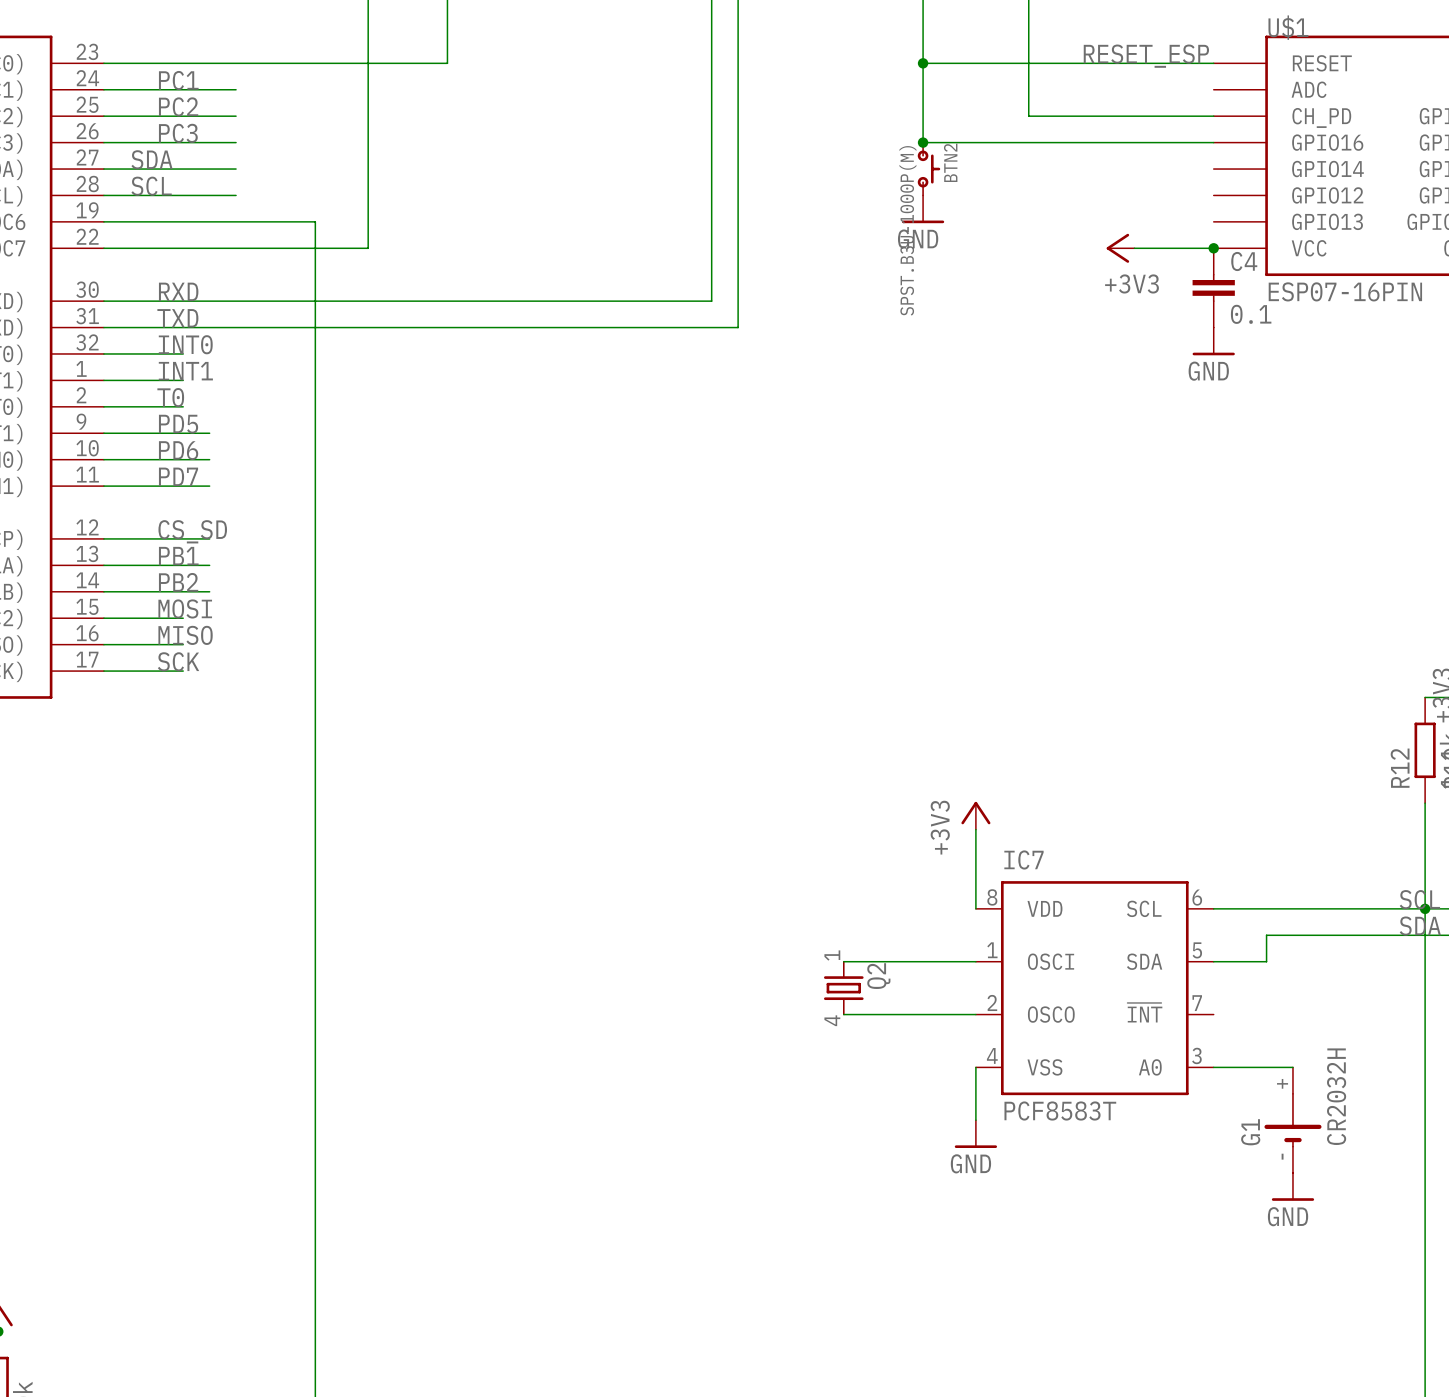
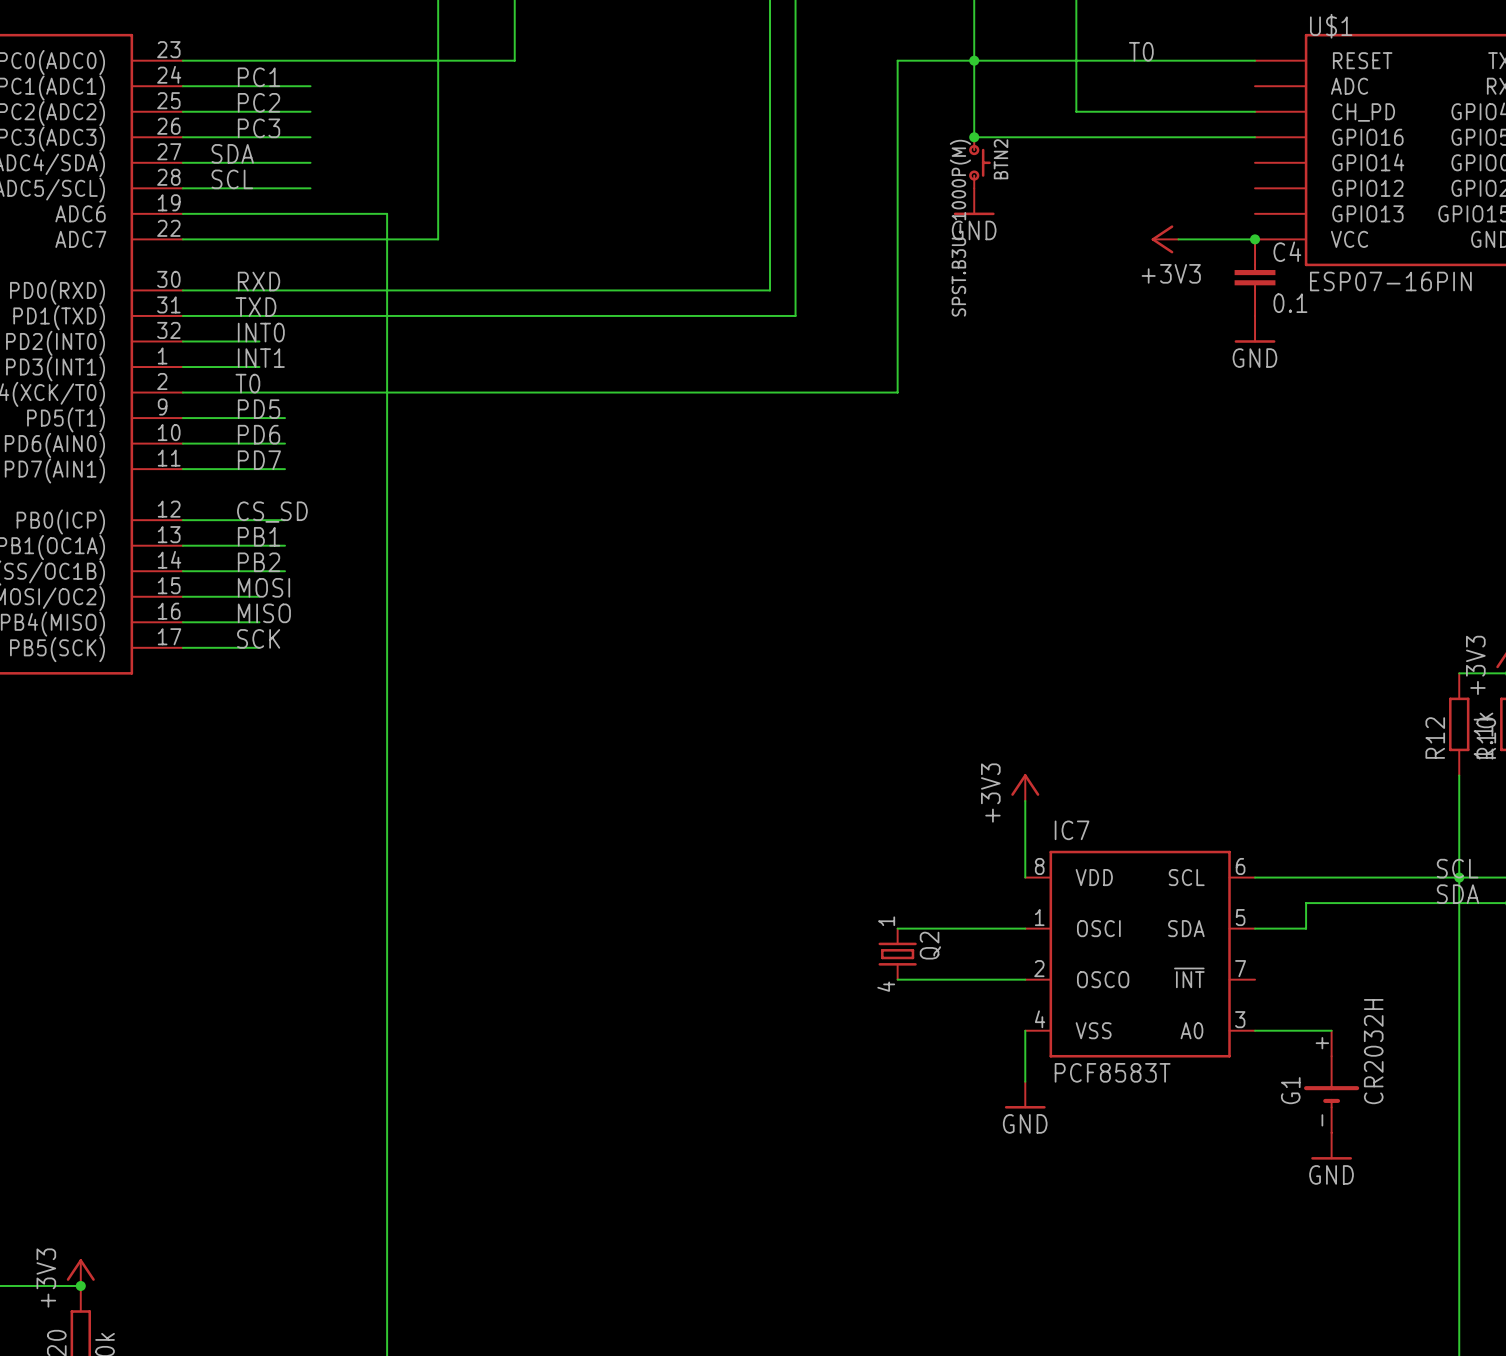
label: RESET_ESP (1146, 56) -> T0 (1141, 51)
wire: none -> (974, 60) (897, 60) (897, 392) (259, 392)

